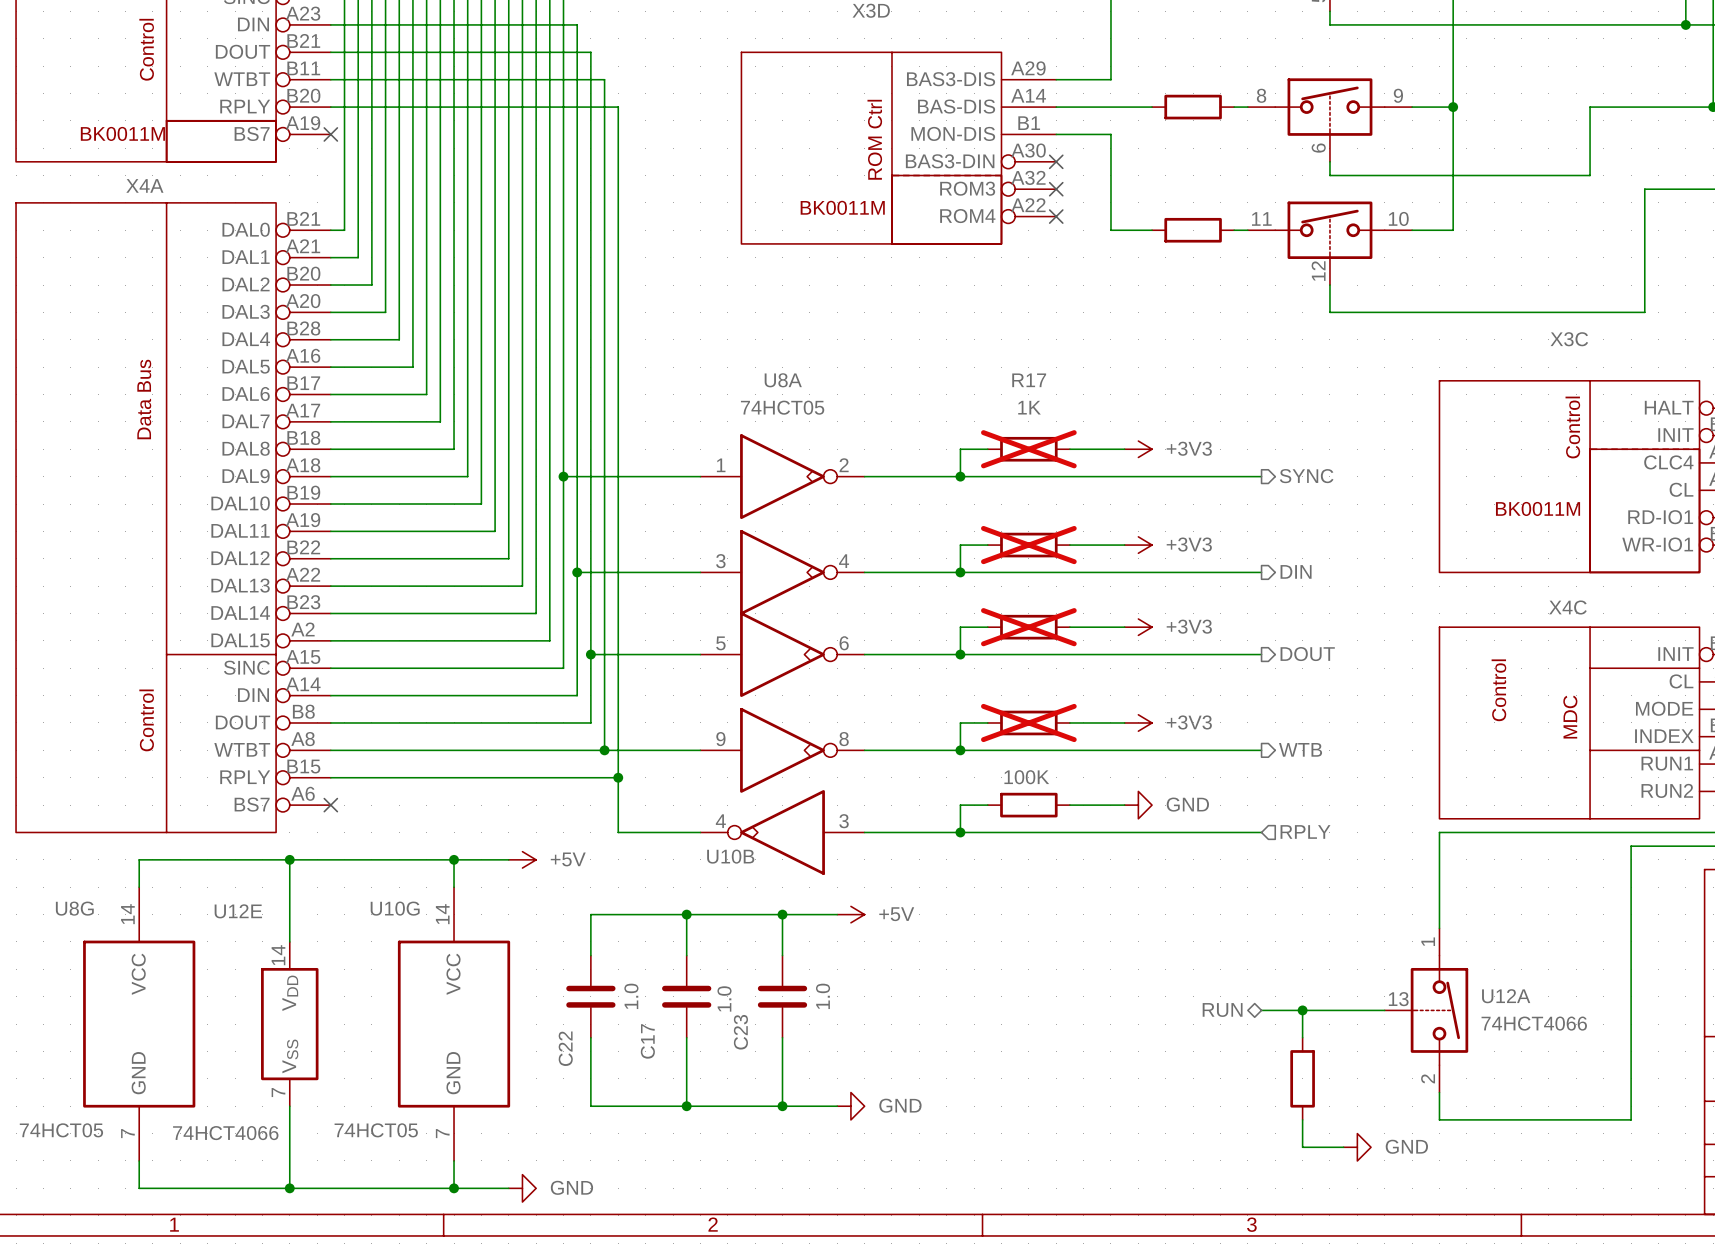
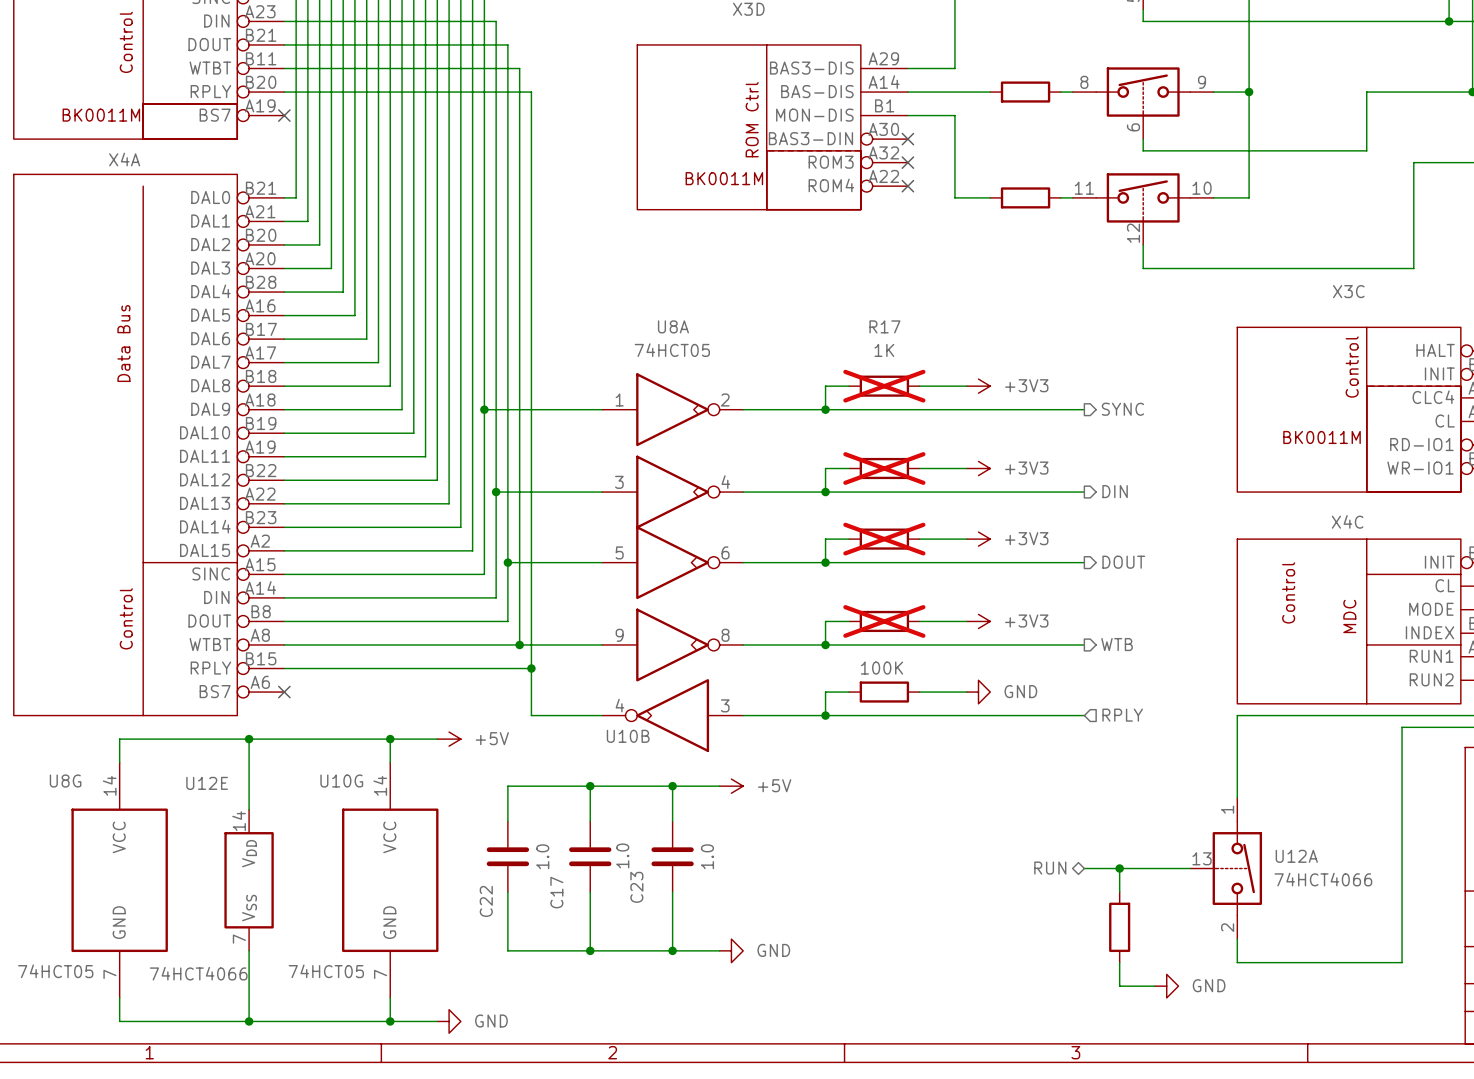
X4A symbol: [16, 202, 331, 833] -> [13, 174, 285, 716]

